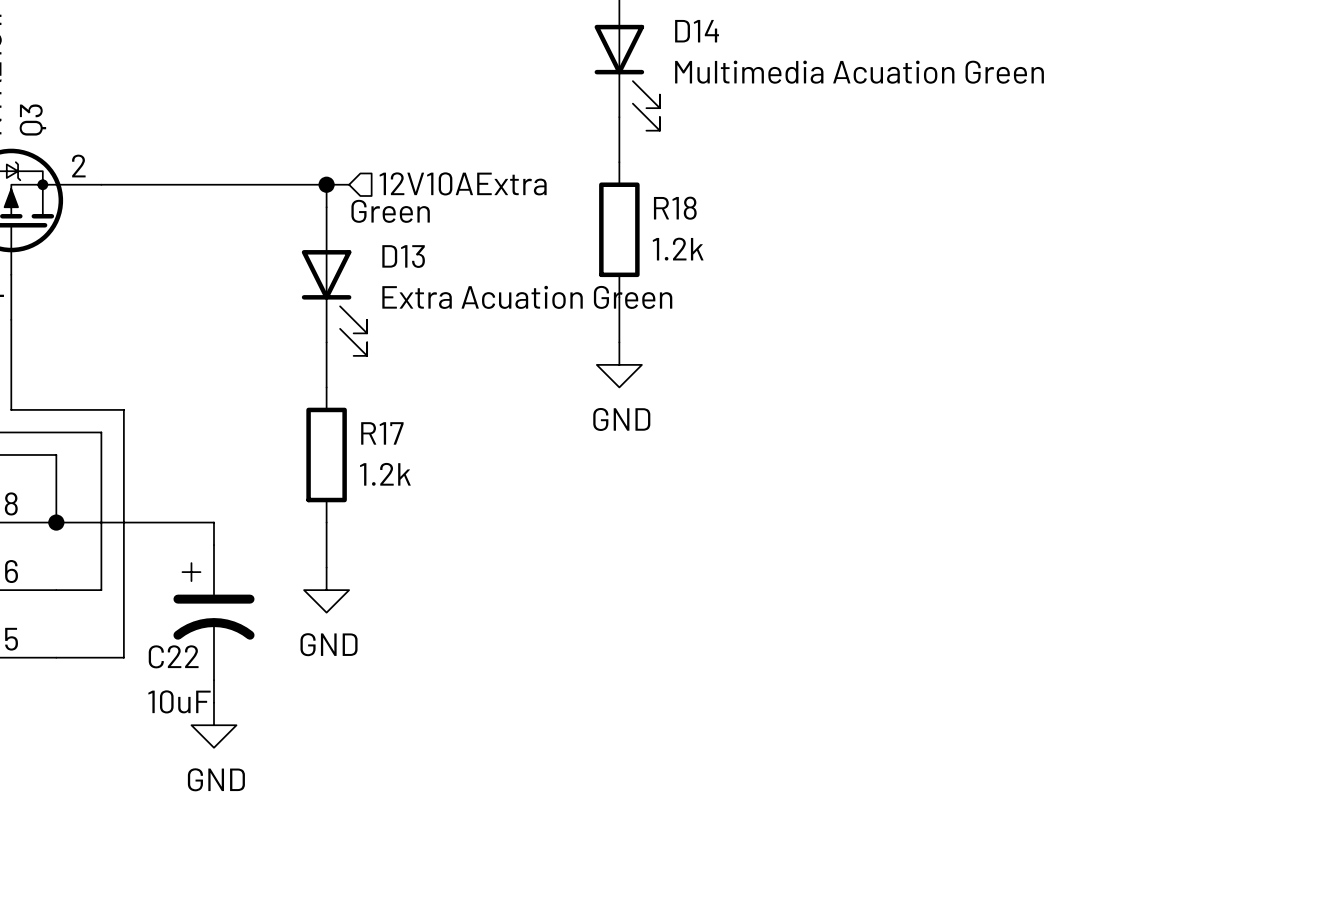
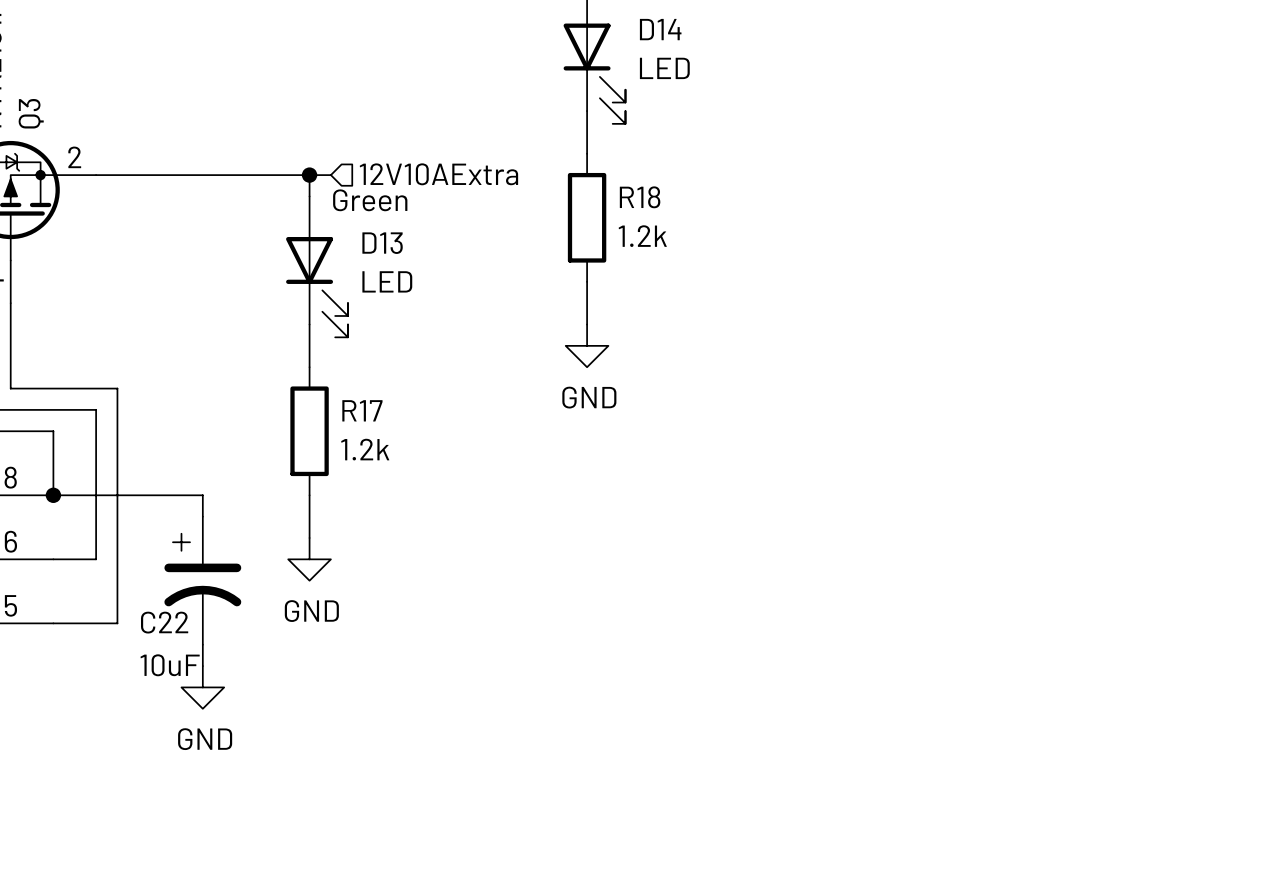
D14 value: Multimedia Acuation Green (859, 72) -> LED (664, 68)
D13 value: Extra Acuation Green (527, 297) -> LED (387, 281)

